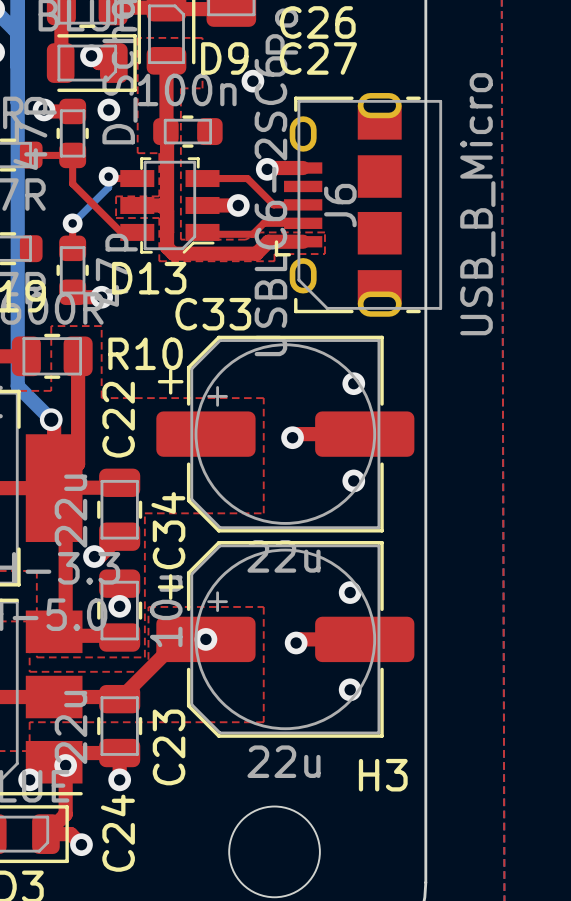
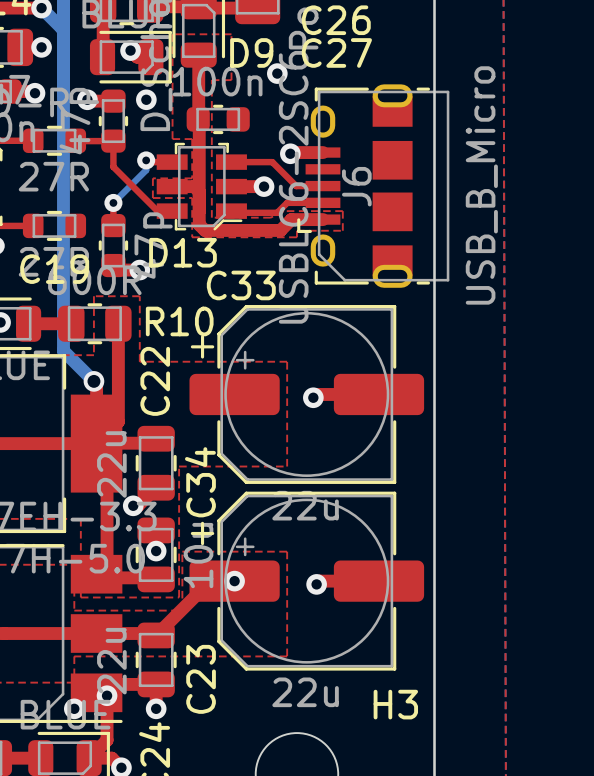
via: (353, 383) -> none
via: (353, 480) -> none
via: (350, 592) -> none
via: (350, 689) -> none

